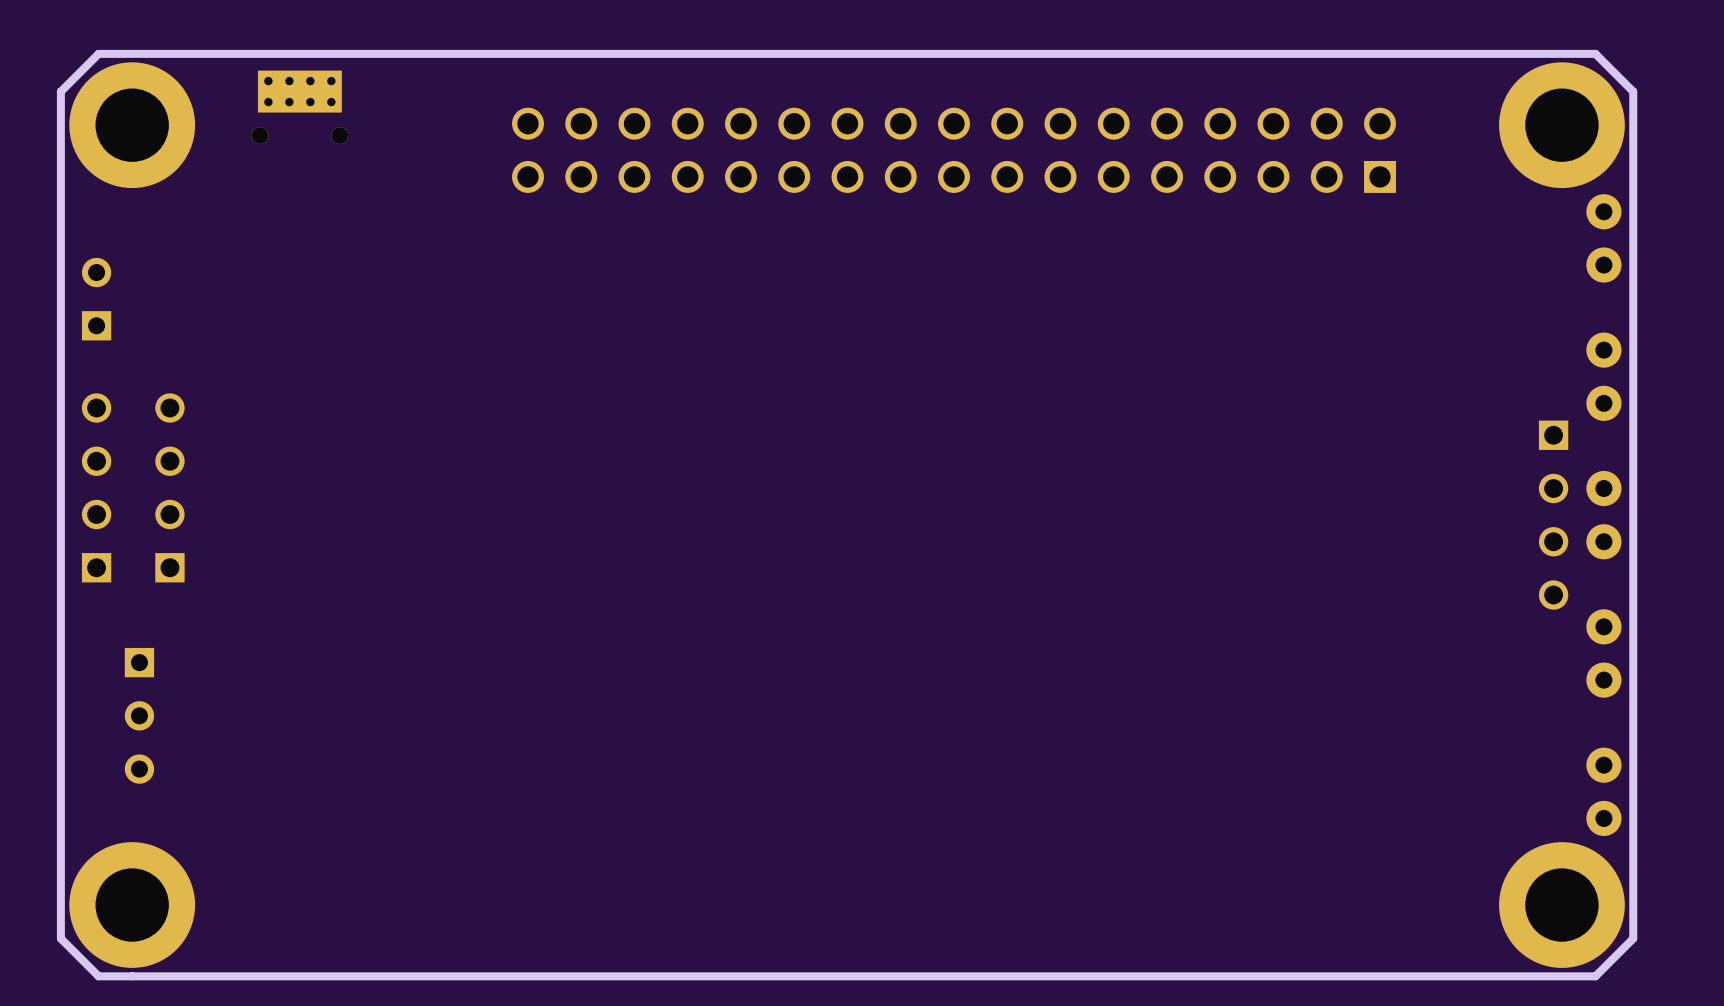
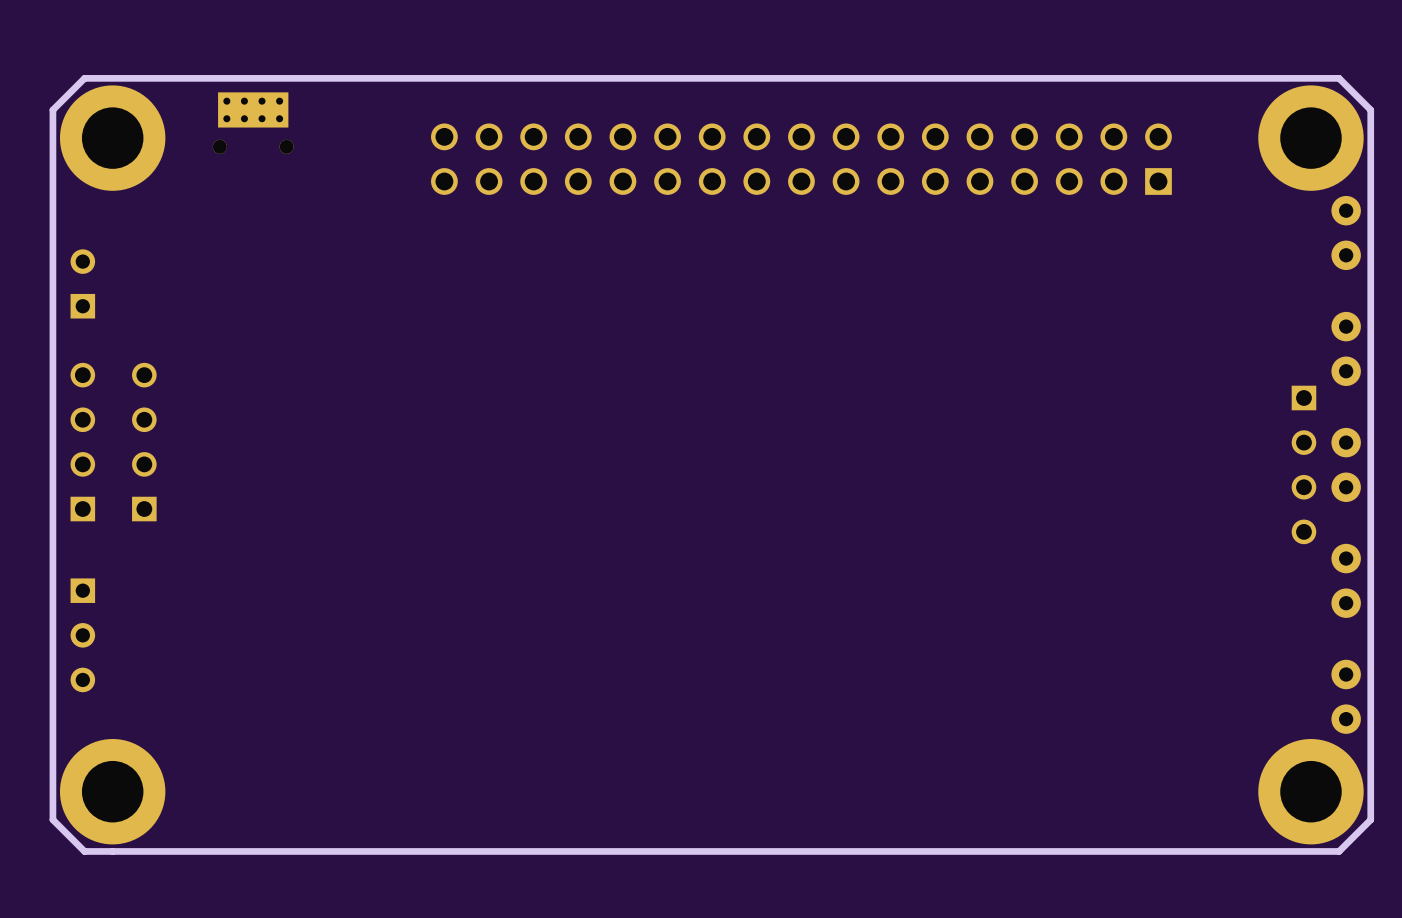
part position: (139, 715) -> (82, 635)

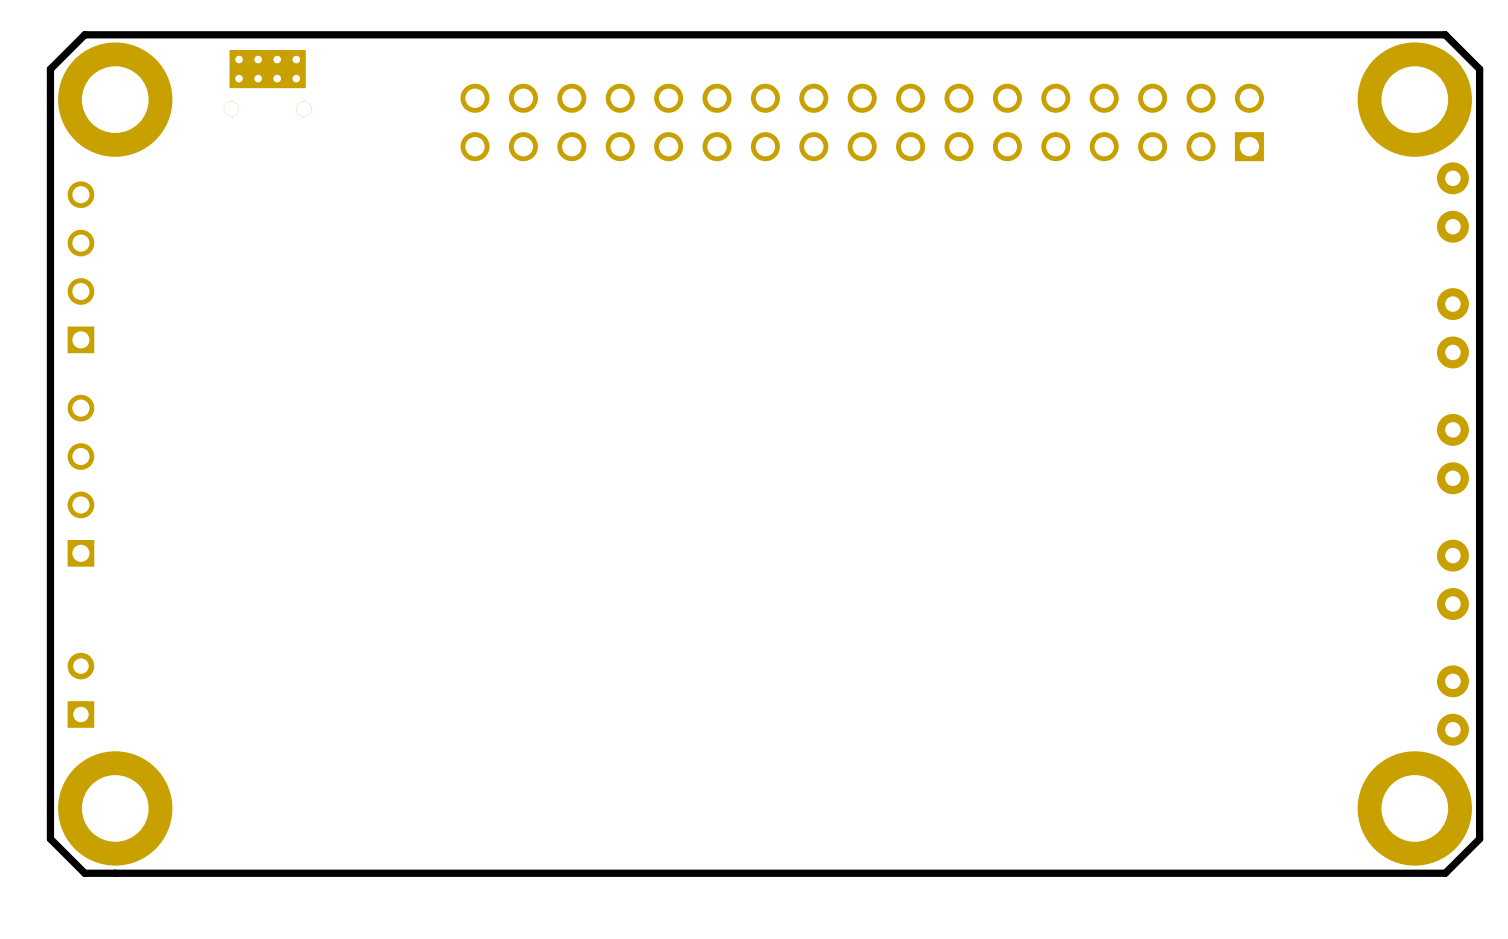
part footprint: [70, 249, 96, 319] -> [67, 181, 95, 354]
part: (82, 442) -> none
part: (144, 442) -> none
part: (1303, 464) -> none
part: none -> (80, 480)
part: (82, 635) -> none
part: none -> (80, 690)

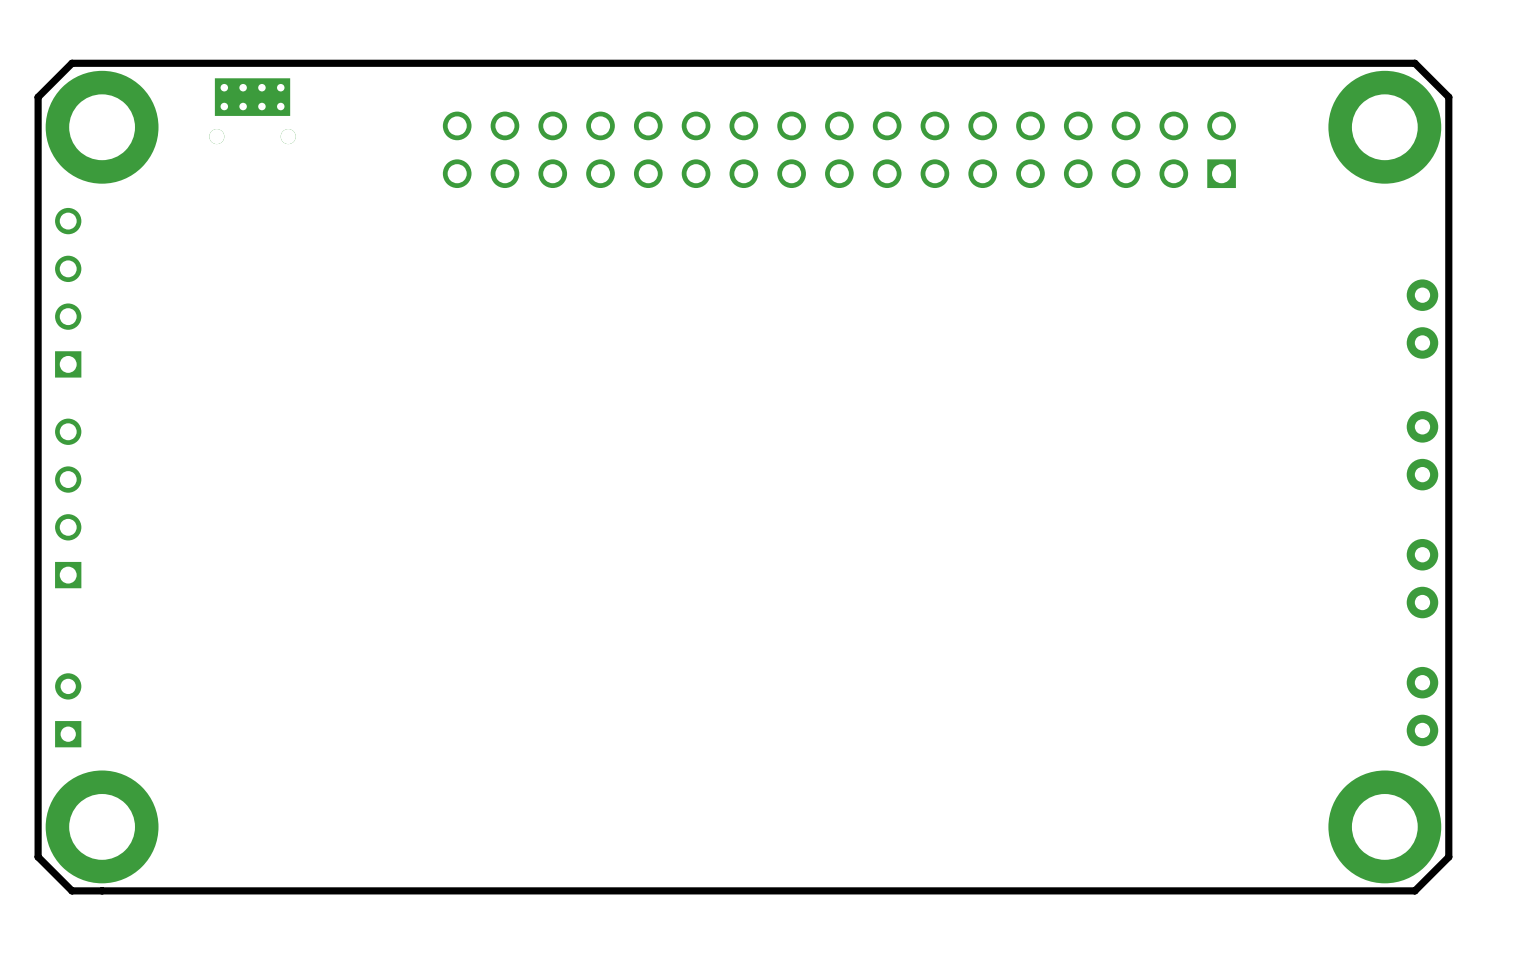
part: (1452, 202) -> none
part position: (1452, 328) -> (1422, 319)
part position: (1452, 454) -> (1422, 450)
part position: (1452, 579) -> (1422, 578)
part position: (1452, 705) -> (1422, 706)

